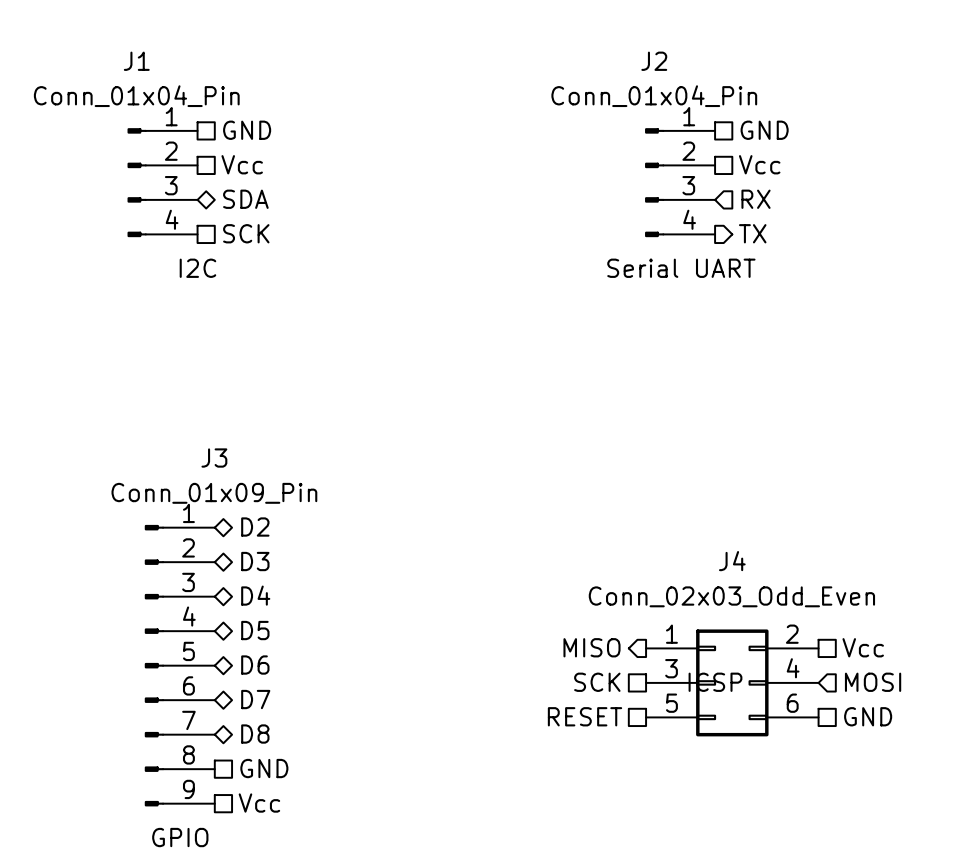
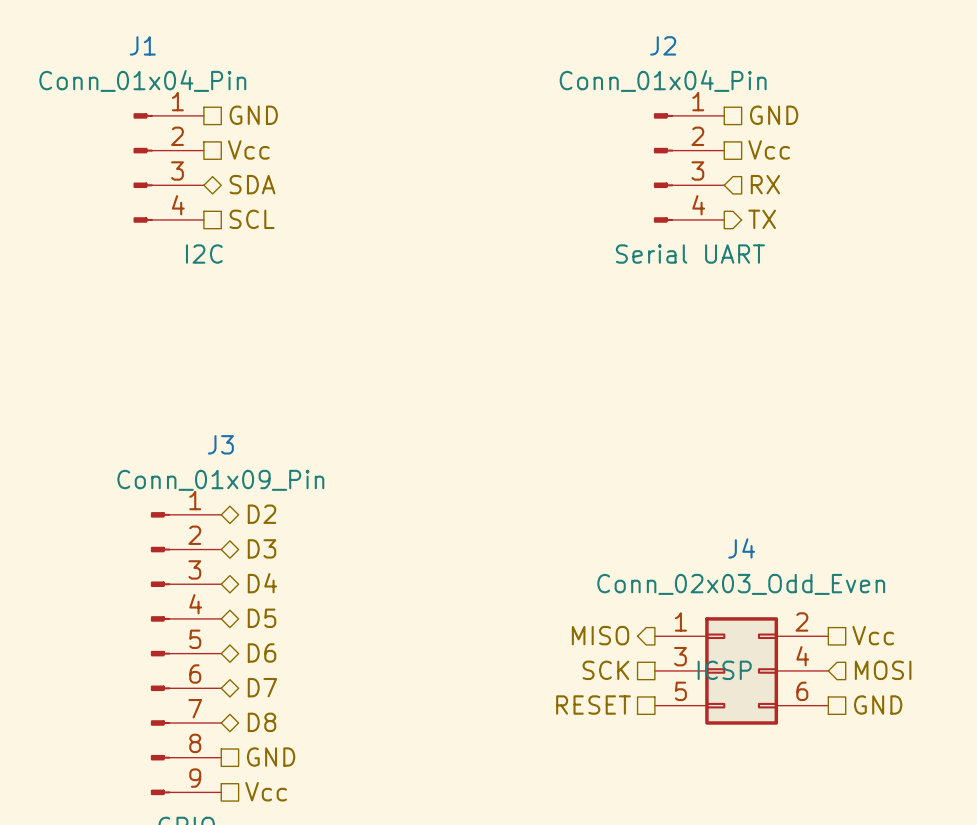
hierarchical label: SCK (246, 233) -> SCL (252, 219)

